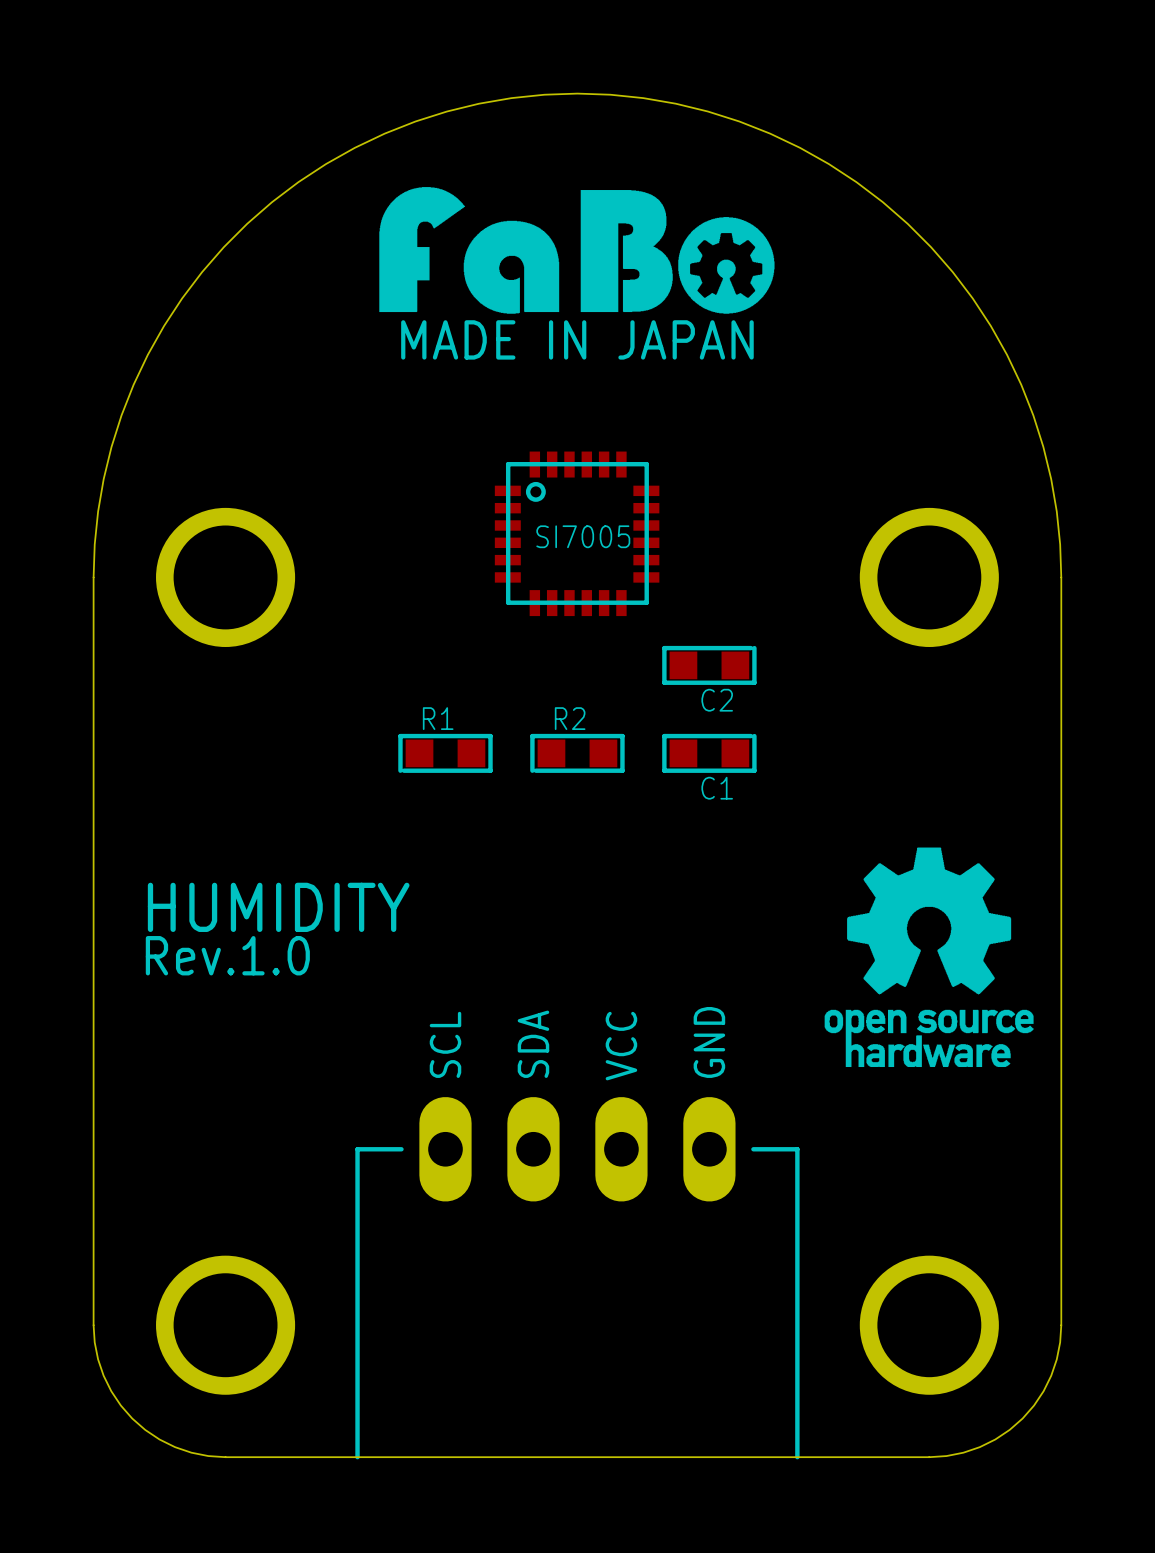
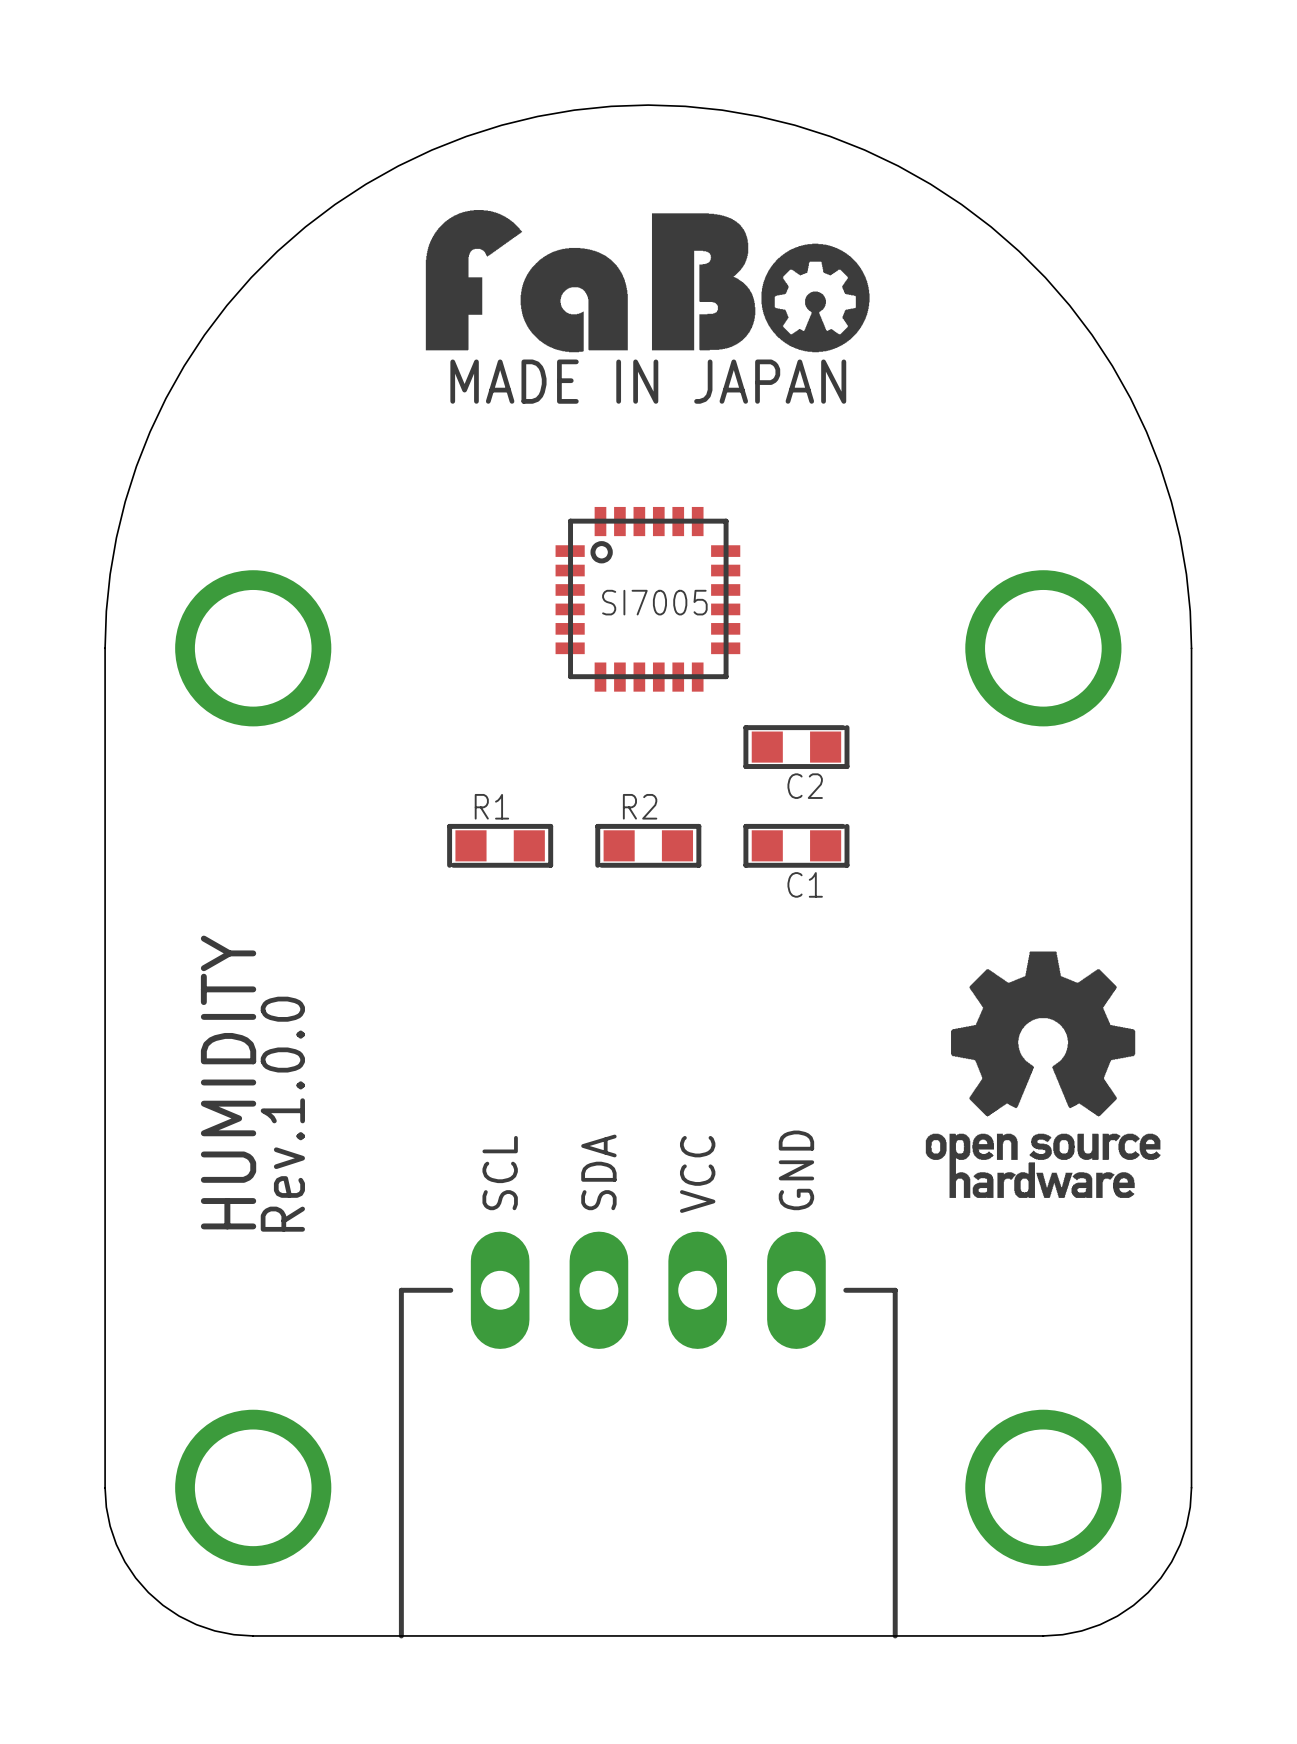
text rotation: 0° (278, 907) -> 90° counterclockwise (228, 1082)
text: Rev.1.0 (227, 955) -> Rev.1.0.0 (282, 1114)

